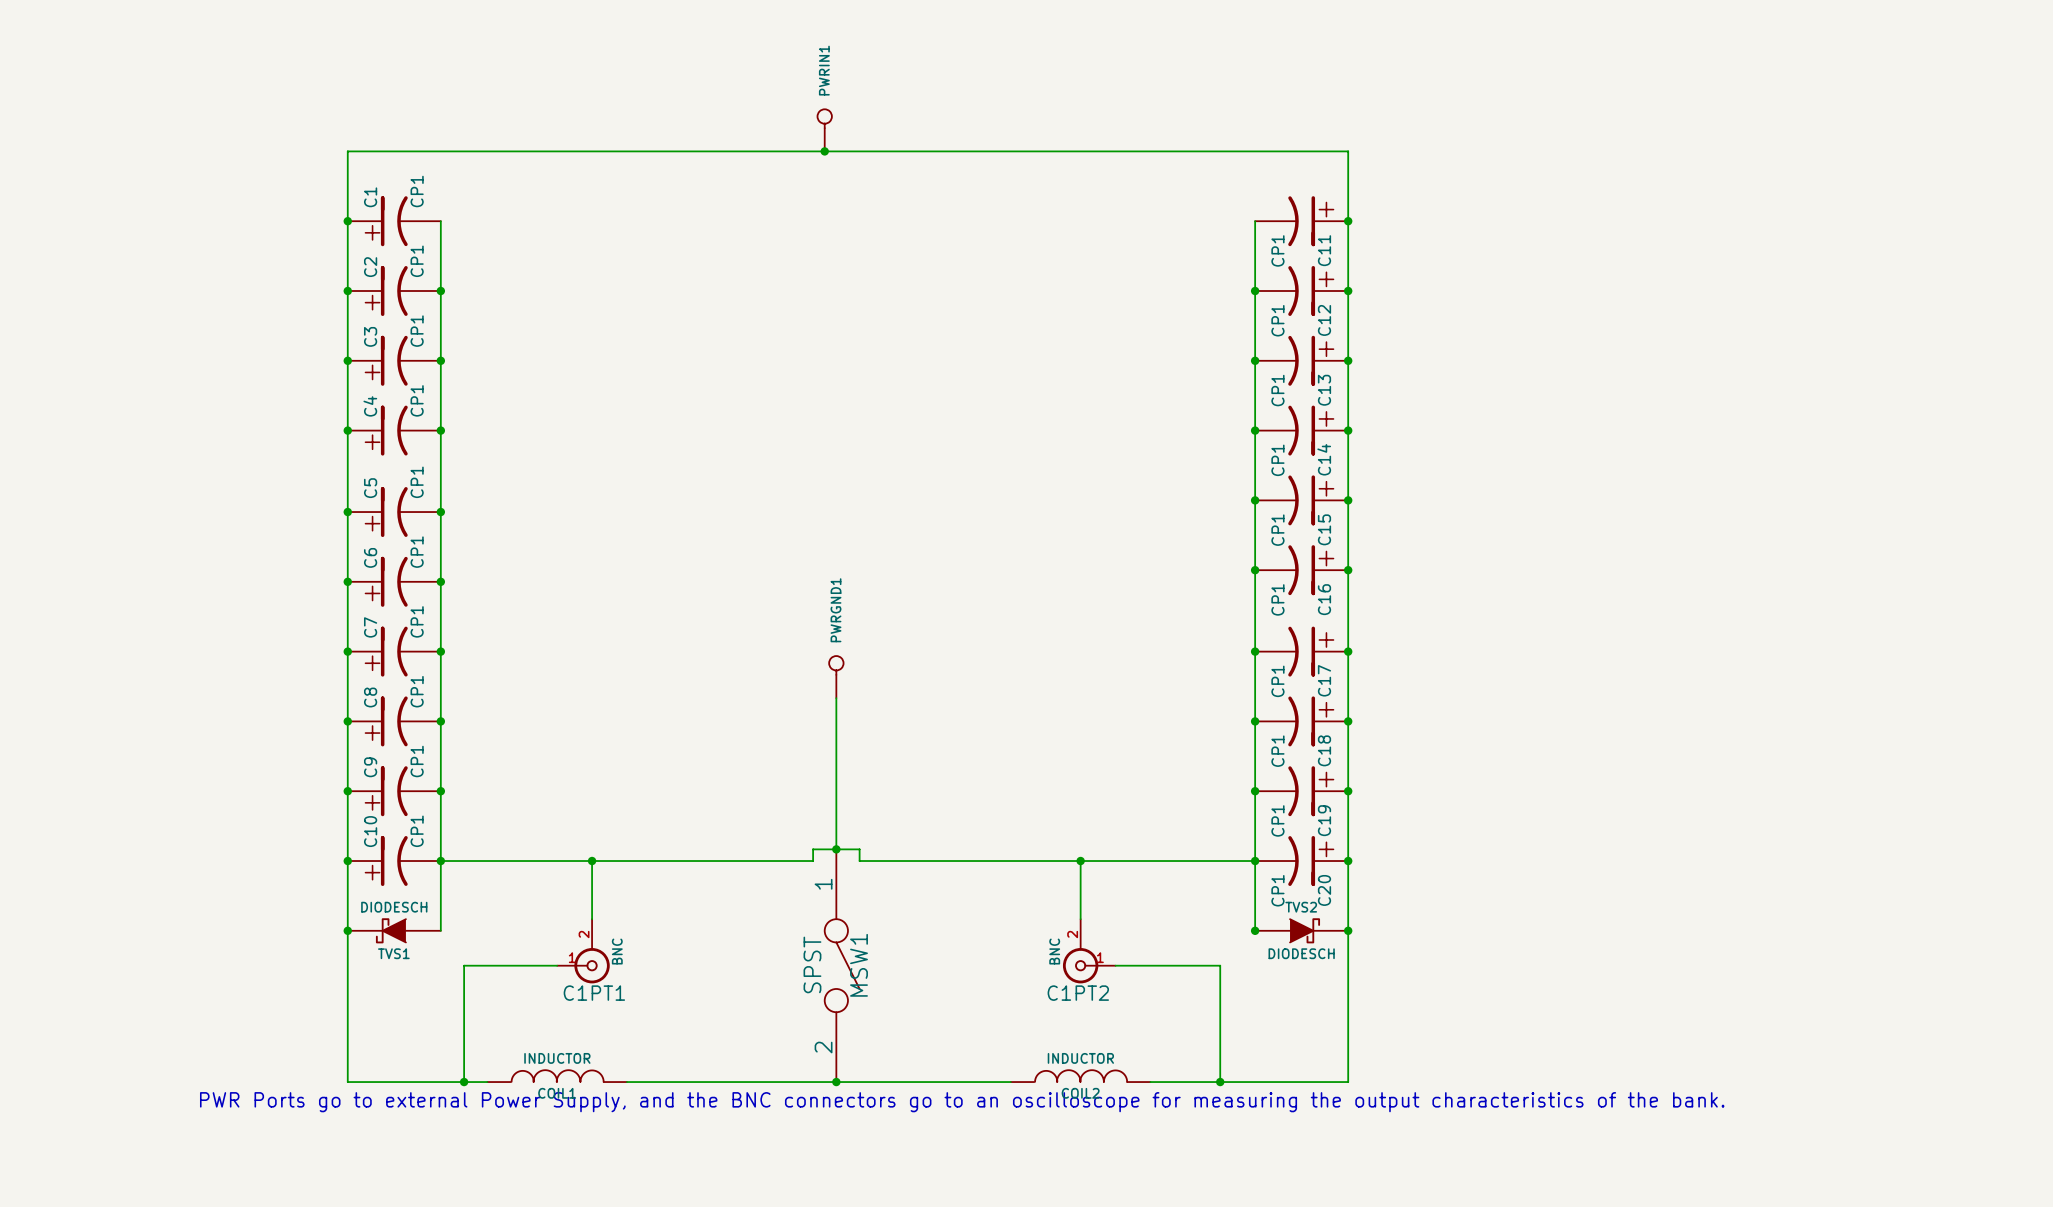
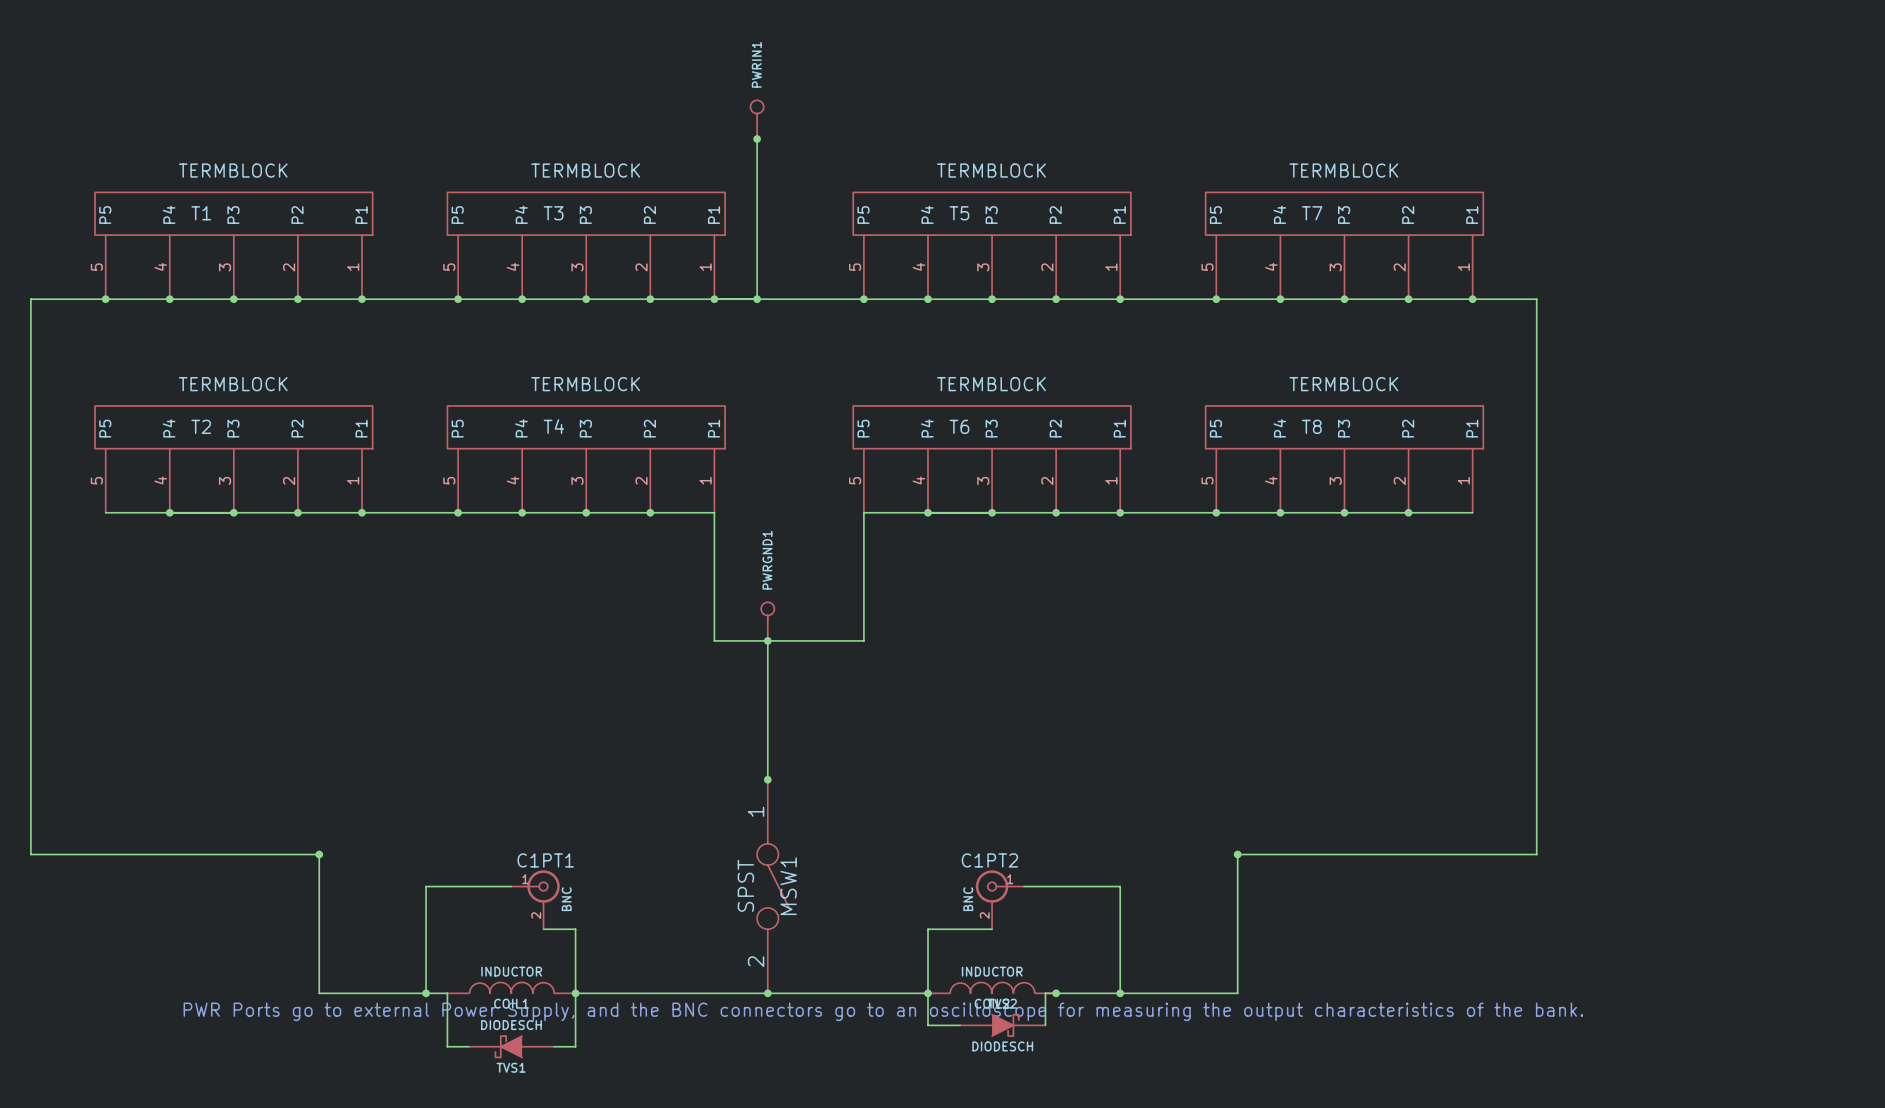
wire: none -> (757, 138) (757, 299)
junction: (347, 221) -> none
C1: CP1 (394, 221) -> none
wire: (440, 221) (440, 930) -> none
wire: (1255, 221) (1255, 930) -> none
C11: CP1 (1301, 221) -> none
junction: (1348, 221) -> none
T1: none -> TERMBLOCK (233, 245)
T3: none -> TERMBLOCK (586, 245)
T5: none -> TERMBLOCK (992, 245)
T7: none -> TERMBLOCK (1344, 245)
junction: (347, 291) -> none
C2: CP1 (394, 291) -> none
junction: (440, 291) -> none
junction: (1255, 291) -> none
C12: CP1 (1301, 291) -> none
junction: (1348, 291) -> none
junction: none -> (105, 299)
junction: none -> (169, 299)
junction: none -> (233, 299)
junction: none -> (297, 299)
junction: none -> (361, 299)
junction: none -> (458, 299)
junction: none -> (522, 299)
junction: none -> (586, 299)
junction: none -> (650, 299)
junction: none -> (714, 299)
junction: none -> (757, 299)
junction: none -> (863, 299)
junction: none -> (927, 299)
junction: none -> (992, 299)
junction: none -> (1056, 299)
junction: none -> (1120, 299)
junction: none -> (1216, 299)
junction: none -> (1280, 299)
junction: none -> (1344, 299)
junction: none -> (1408, 299)
junction: none -> (1472, 299)
junction: (347, 360) -> none
C3: CP1 (394, 360) -> none
junction: (440, 360) -> none
junction: (1255, 360) -> none
C13: CP1 (1301, 360) -> none
junction: (1348, 360) -> none
junction: (347, 430) -> none
C4: CP1 (394, 430) -> none
junction: (440, 430) -> none
junction: (1255, 430) -> none
C14: CP1 (1301, 430) -> none
junction: (1348, 430) -> none
T2: none -> TERMBLOCK (233, 459)
T4: none -> TERMBLOCK (586, 459)
T6: none -> TERMBLOCK (992, 459)
junction: (1255, 500) -> none
C15: CP1 (1301, 500) -> none
junction: (1348, 500) -> none
T8: none -> TERMBLOCK (1344, 459)
junction: (347, 512) -> none
C5: CP1 (394, 512) -> none
junction: (440, 512) -> none
wire: none -> (105, 512) (714, 512) (714, 640) (863, 640) (863, 512) (1472, 512)
junction: none -> (169, 512)
junction: none -> (233, 512)
junction: none -> (297, 512)
junction: none -> (361, 512)
junction: none -> (458, 512)
junction: none -> (522, 512)
junction: none -> (586, 512)
junction: none -> (650, 512)
junction: none -> (927, 512)
junction: none -> (992, 512)
junction: none -> (1056, 512)
junction: none -> (1120, 512)
junction: none -> (1216, 512)
junction: none -> (1280, 512)
junction: none -> (1344, 512)
junction: none -> (1408, 512)
junction: (1255, 570) -> none
C16: CP1 (1301, 570) -> none
junction: (1348, 570) -> none
junction: (347, 581) -> none
C6: CP1 (394, 581) -> none
junction: (440, 581) -> none
junction: (347, 651) -> none
C7: CP1 (394, 651) -> none
junction: (440, 651) -> none
junction: (1255, 651) -> none
C17: CP1 (1301, 651) -> none
junction: (1348, 651) -> none
junction: none -> (767, 640)
junction: (347, 721) -> none
C8: CP1 (394, 721) -> none
junction: (440, 721) -> none
junction: (1255, 721) -> none
C18: CP1 (1301, 721) -> none
junction: (1348, 721) -> none
junction: (347, 791) -> none
C9: CP1 (394, 791) -> none
junction: (440, 791) -> none
junction: (1255, 791) -> none
C19: CP1 (1301, 791) -> none
junction: (1348, 791) -> none
junction: (347, 861) -> none
C10: CP1 (394, 861) -> none
wire: (440, 861) (813, 861) (813, 849) (859, 849) (859, 861) (1255, 861) -> none
junction: (440, 861) -> none
wire: (592, 861) (592, 919) -> none
junction: (592, 861) -> none
wire: (1080, 861) (1080, 919) -> none
junction: (1080, 861) -> none
junction: (1255, 861) -> none
C20: CP1 (1301, 861) -> none
junction: (1348, 861) -> none
wire: (347, 930) (347, 151) (1348, 151) (1348, 930) -> (319, 854) (30, 854) (30, 299) (1536, 299) (1536, 854) (1237, 854)
TVS1 position: (394, 930) -> (511, 1046)
junction: (1255, 930) -> none
TVS2 position: (1301, 930) -> (1002, 1025)
C1PT1 flip: as is (592, 965) -> up-down (543, 886)
C1PT2 flip: as is (1080, 965) -> up-down (992, 886)
wire: none -> (543, 929) (575, 929) (575, 1046) (554, 1046)
wire: none -> (992, 929) (927, 929) (927, 1025) (960, 1025)
wire: none -> (447, 993) (447, 1046) (468, 1046)
junction: none -> (575, 993)
junction: none -> (927, 993)
wire: none -> (1056, 993) (1045, 993) (1045, 1025)
junction: none -> (1056, 993)

